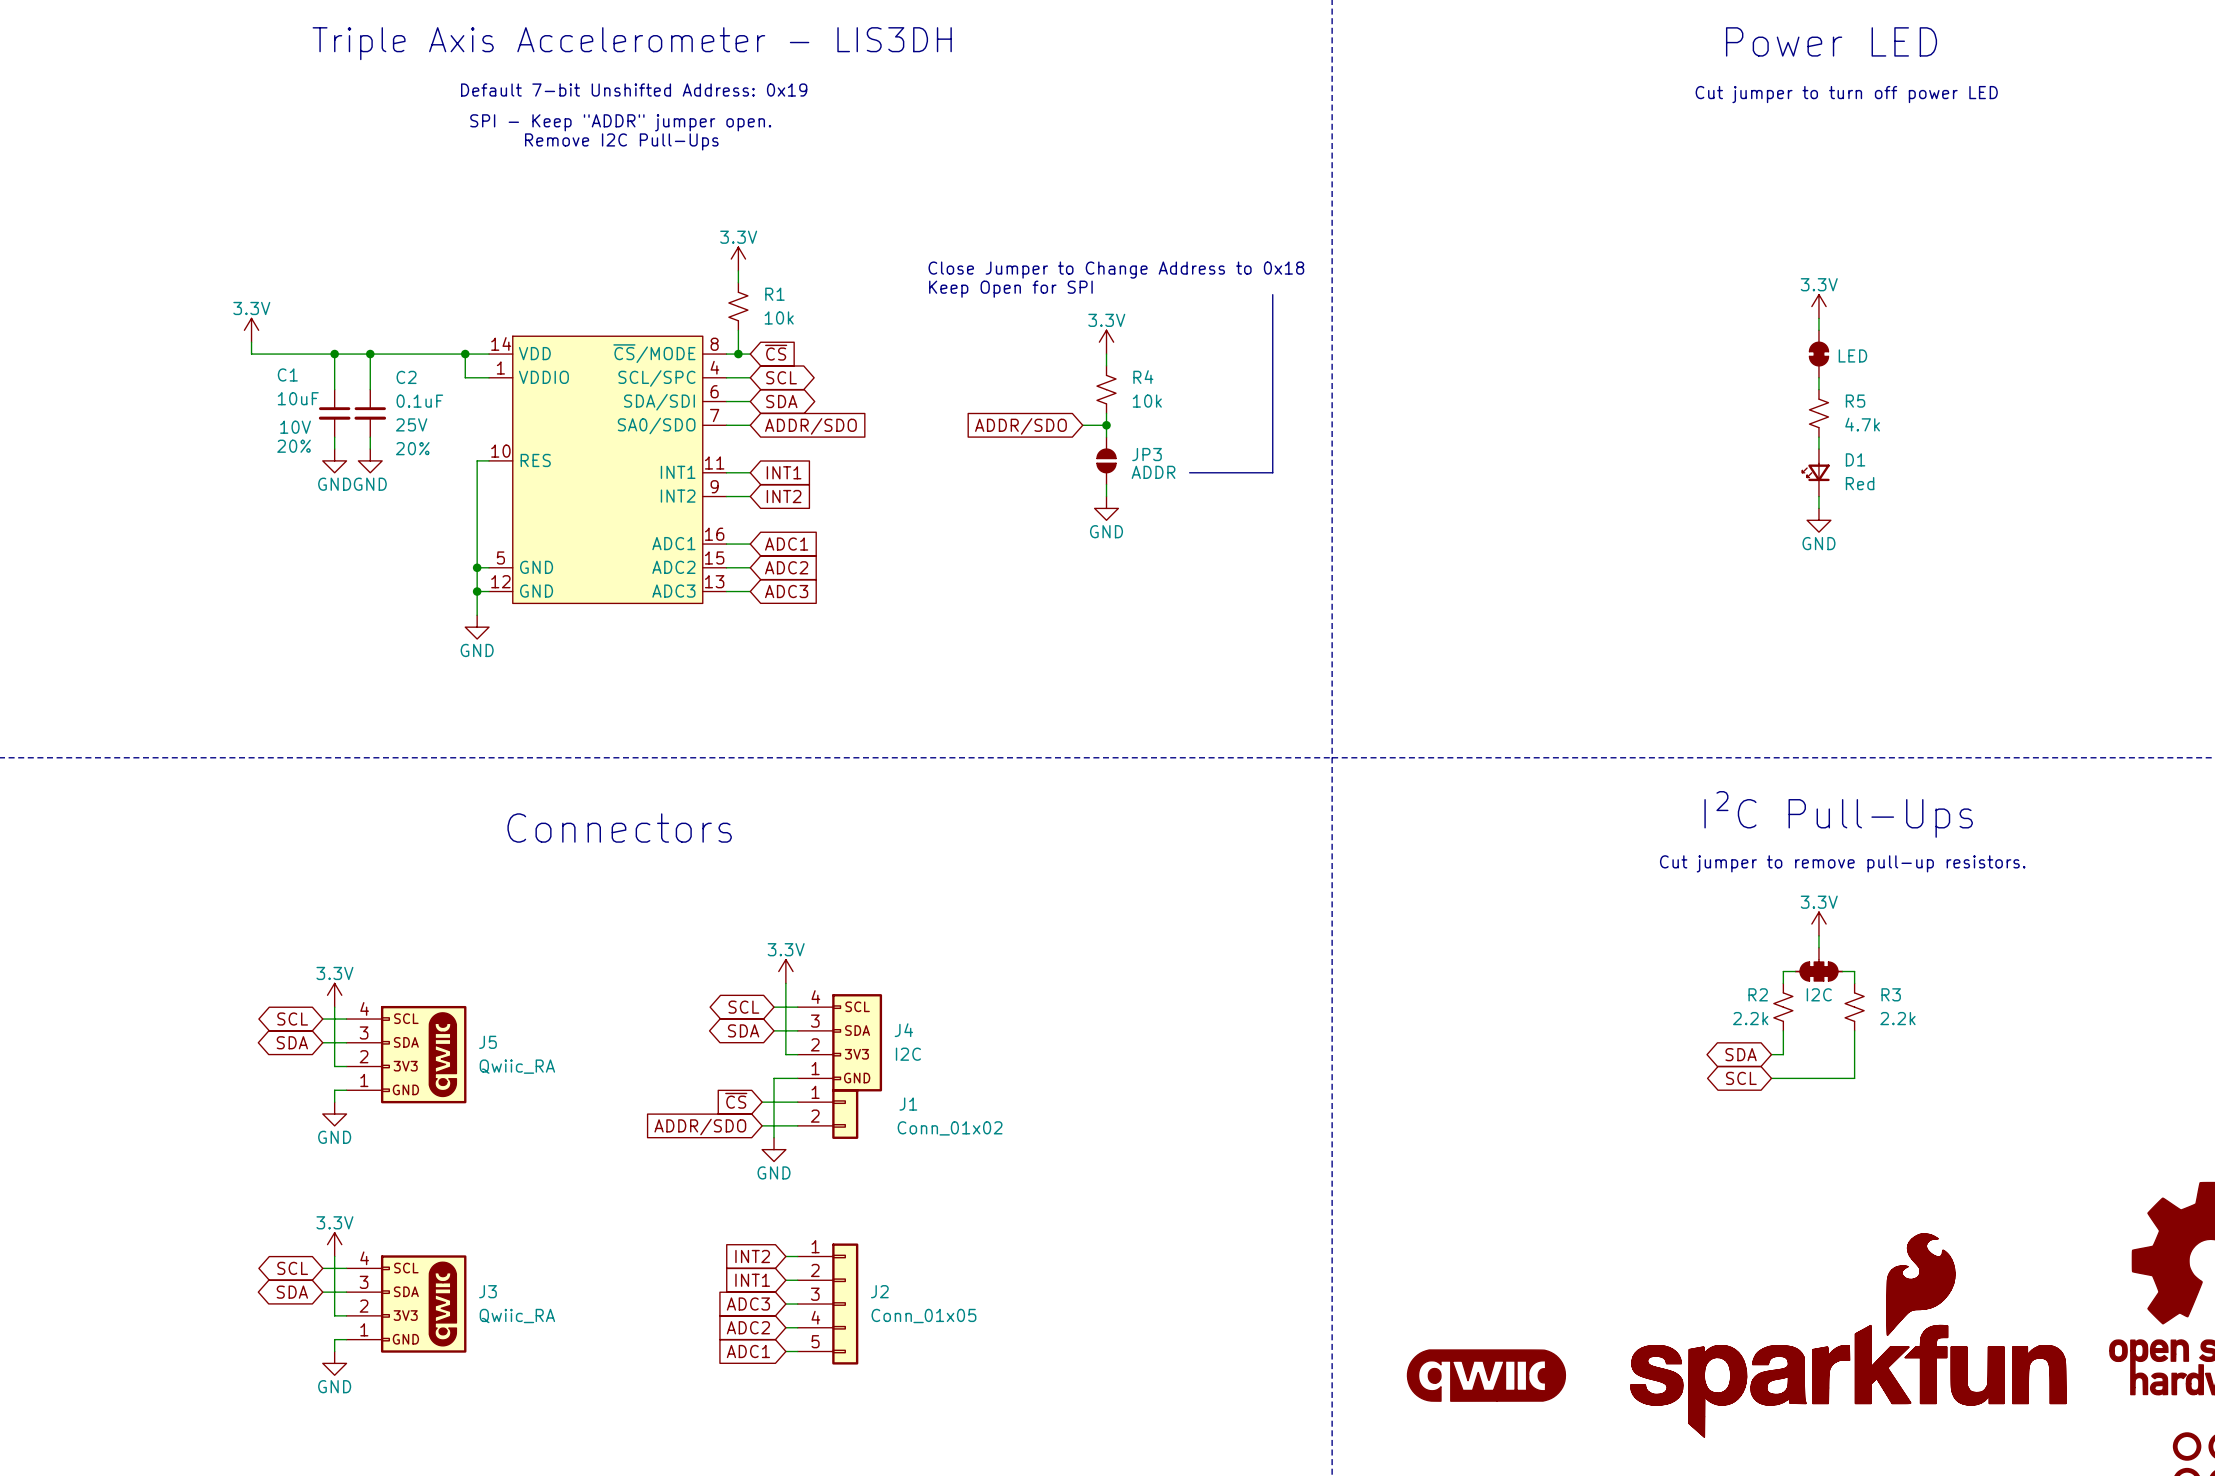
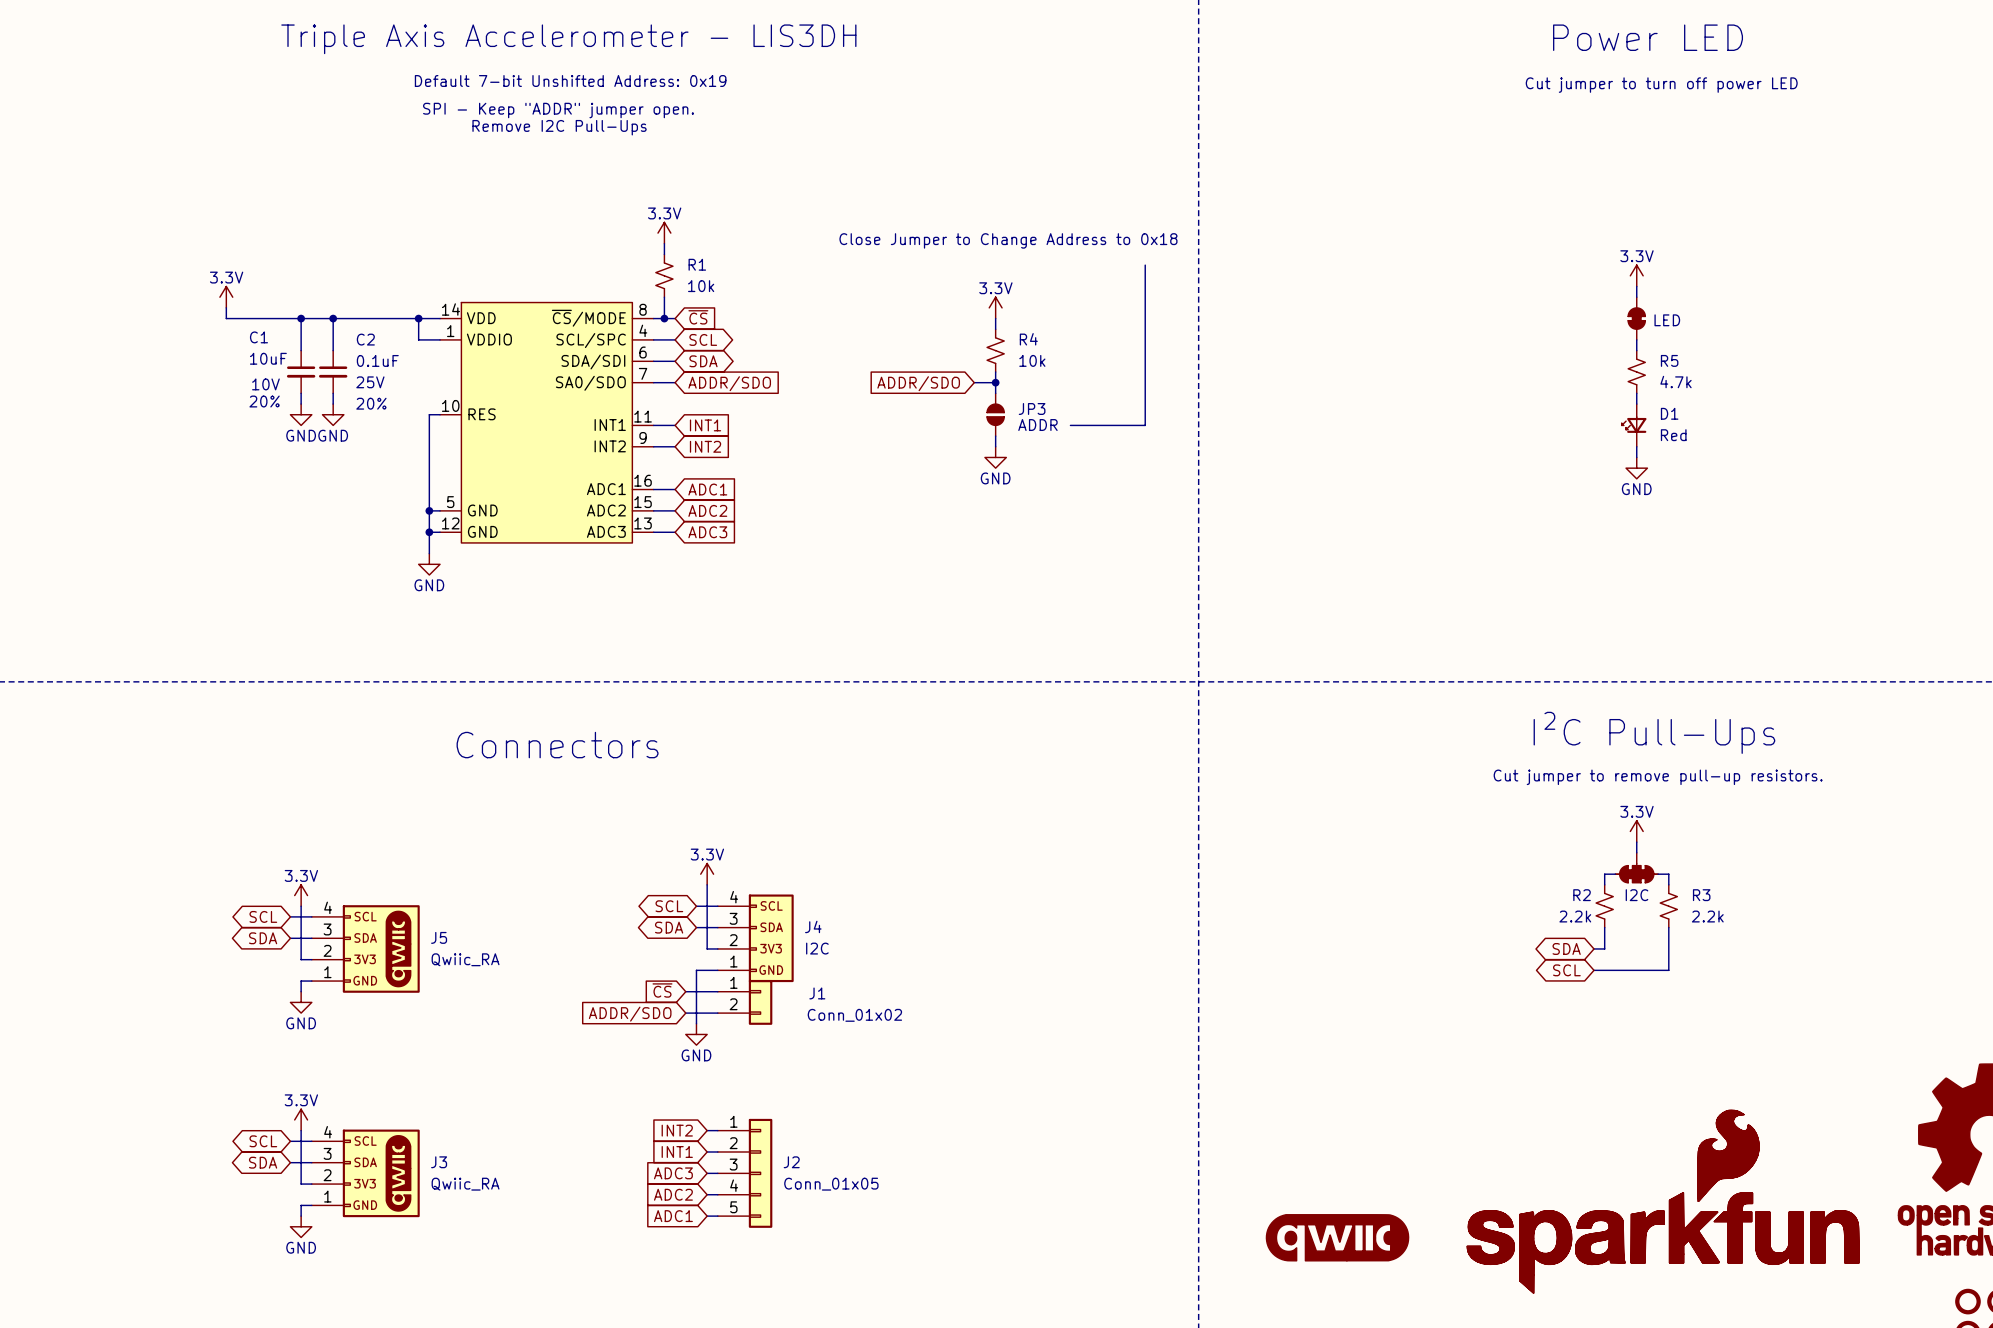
text position: Close Jumper to Change Address to 0x18 (1116, 270) -> Close Jumper to Change Address to 0x18 (1008, 240)
text: Keep Open for SPI (1010, 289) -> none

